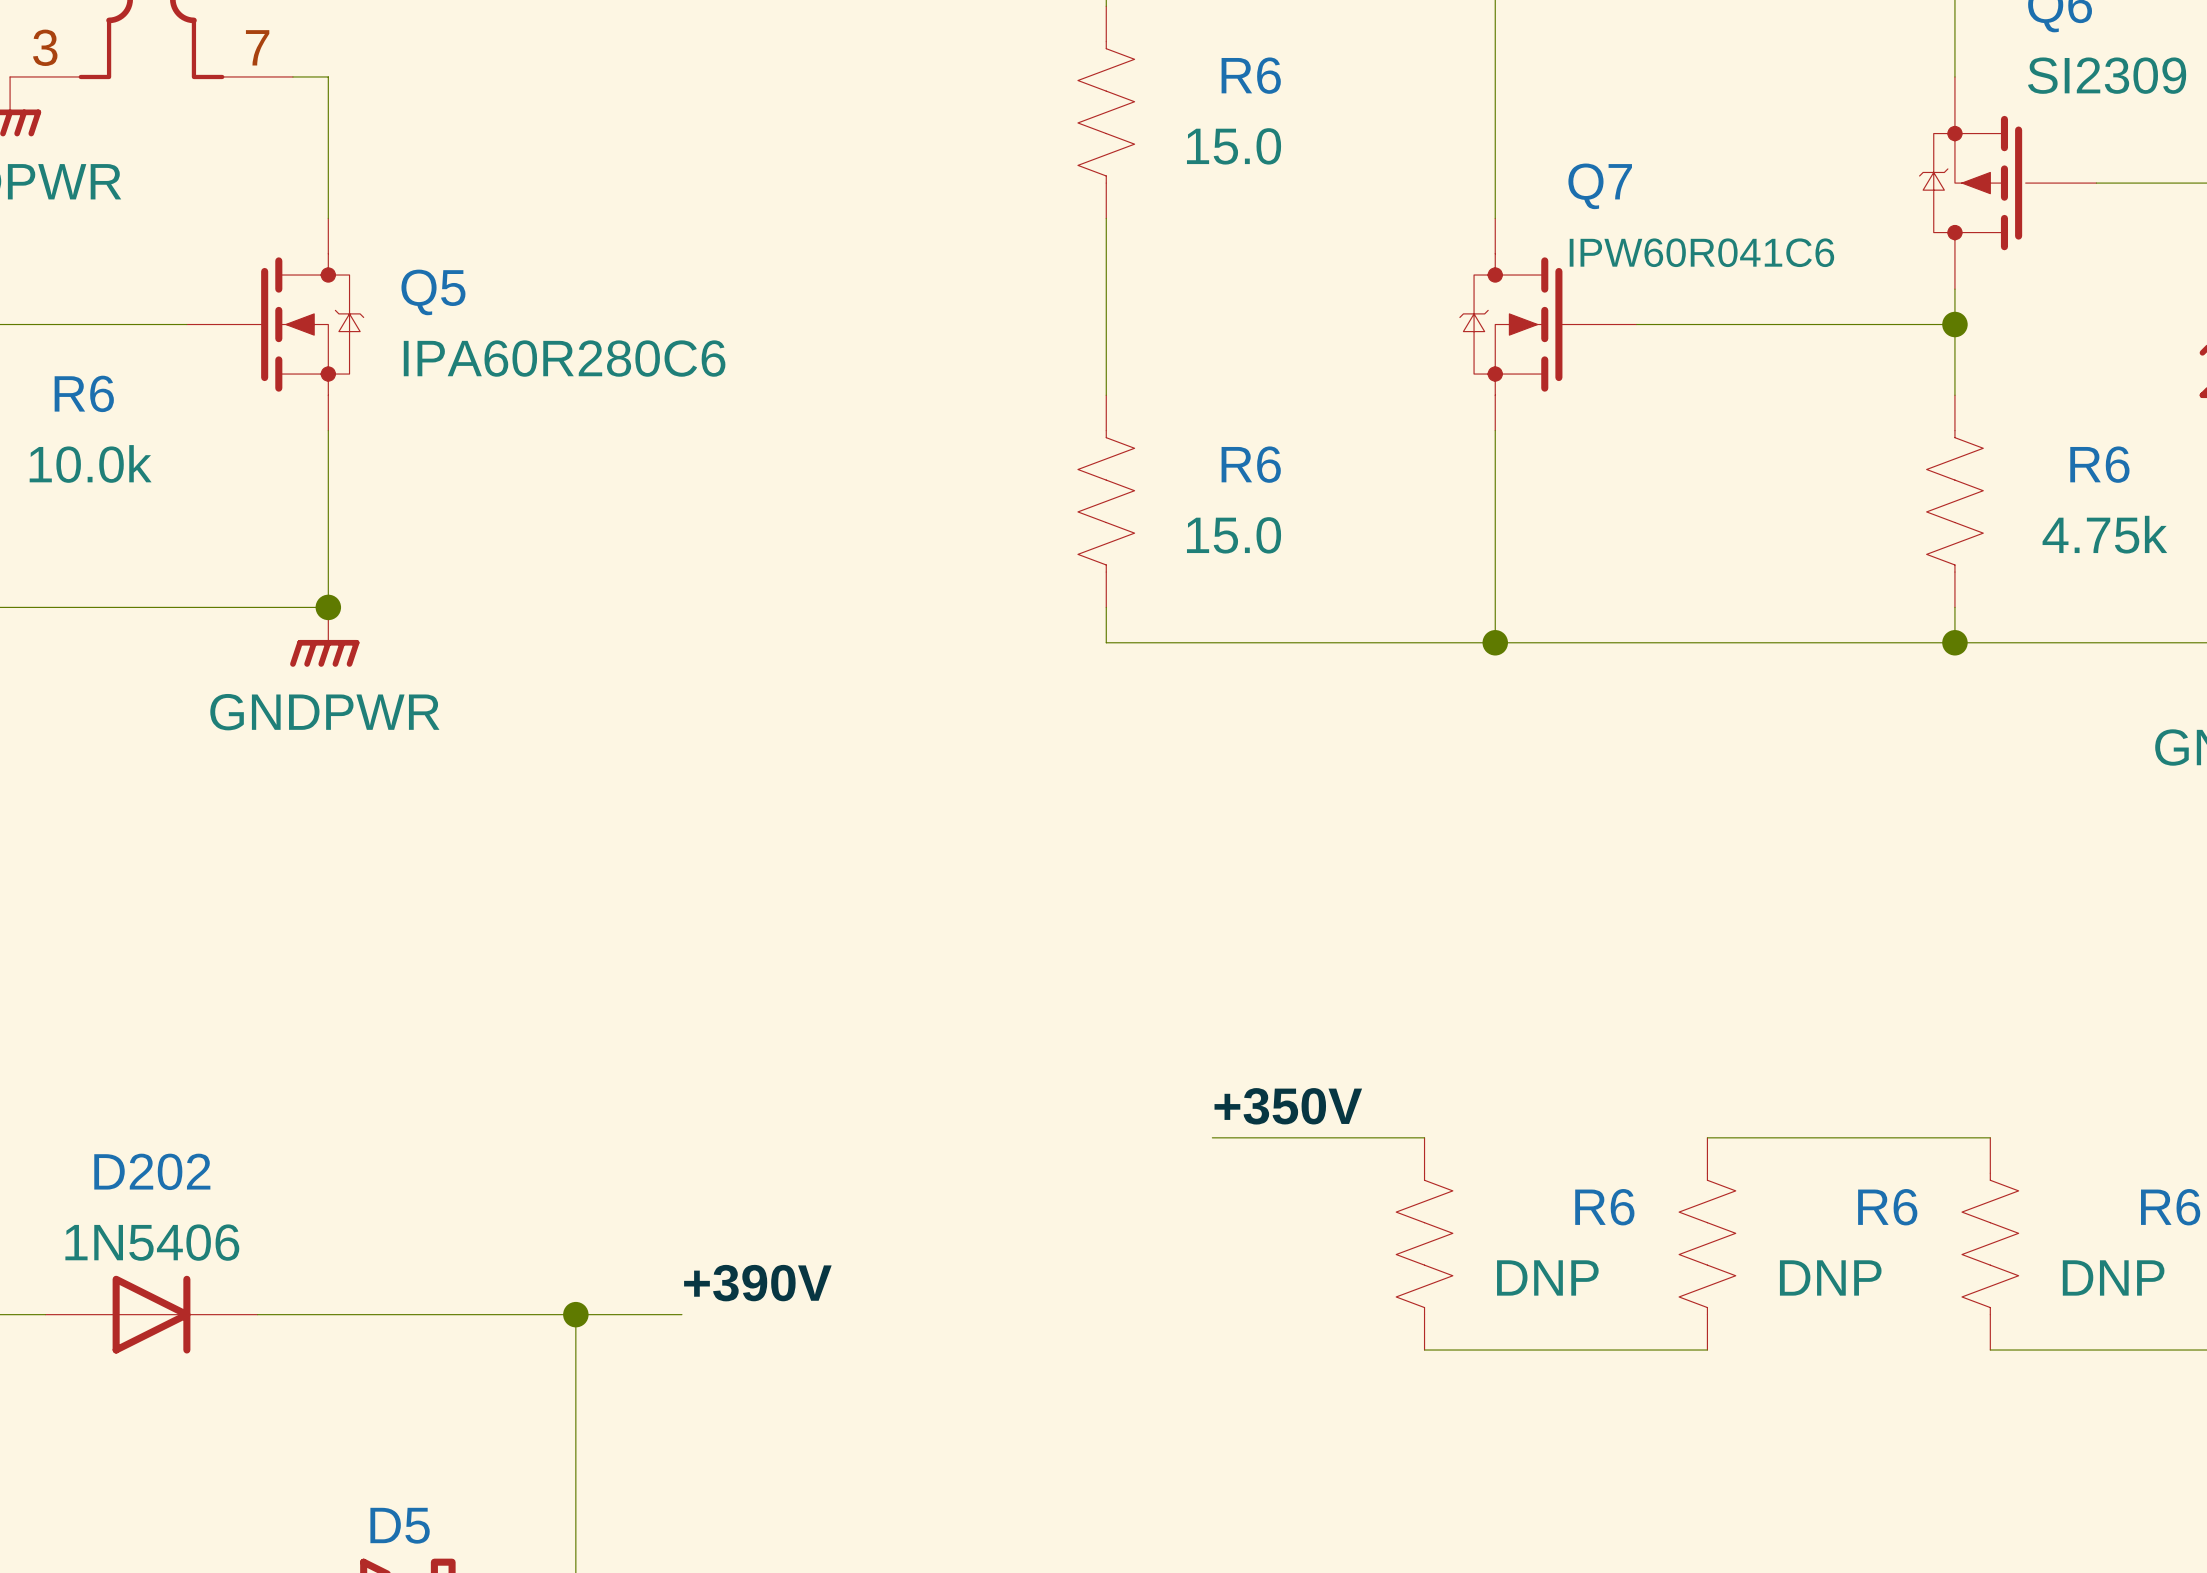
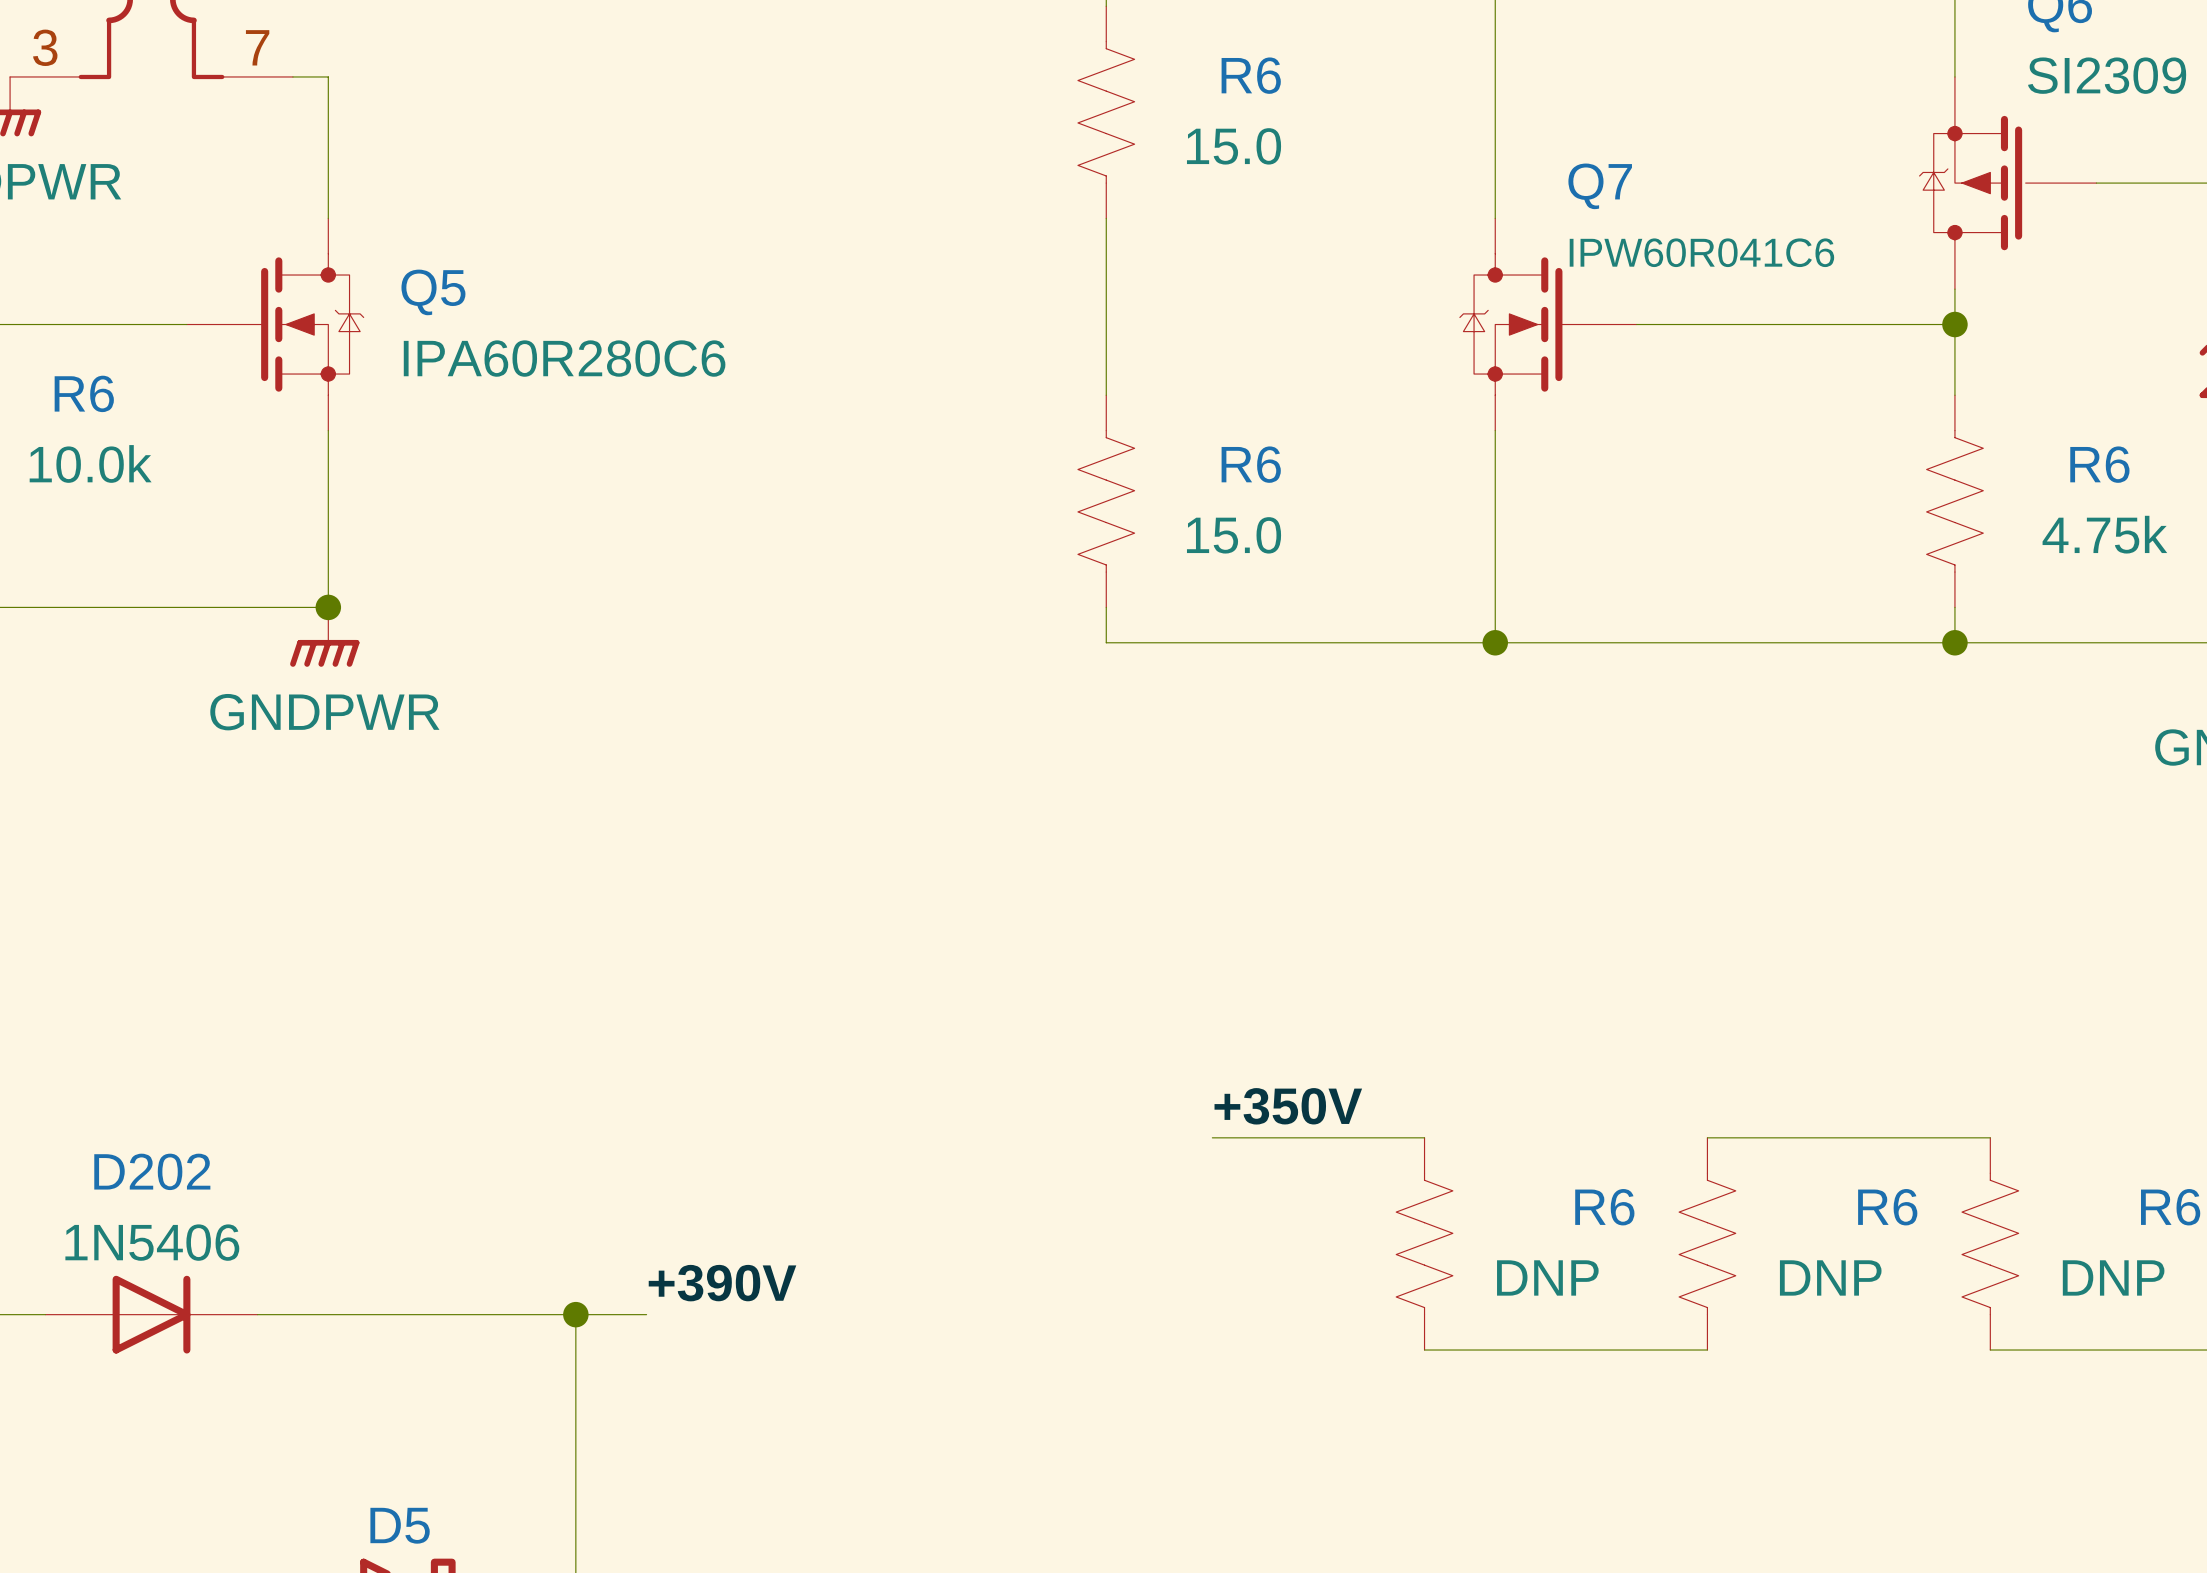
label position: +390V (757, 1283) -> +390V (722, 1283)
wire: (646, 1314) (681, 1314) -> none

